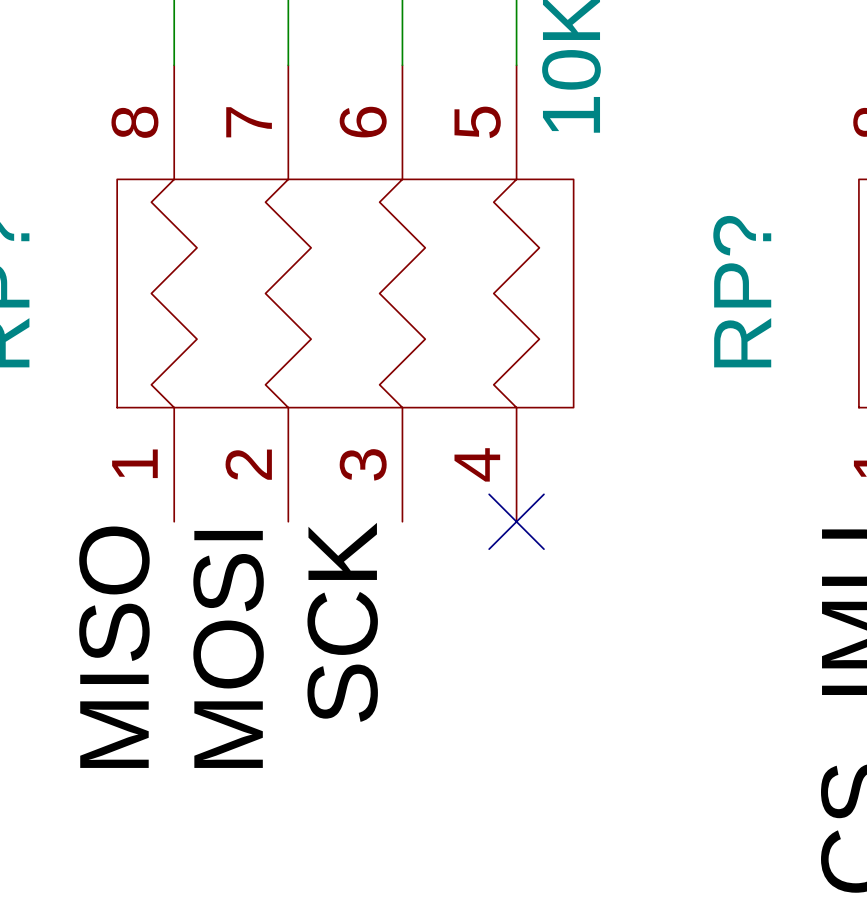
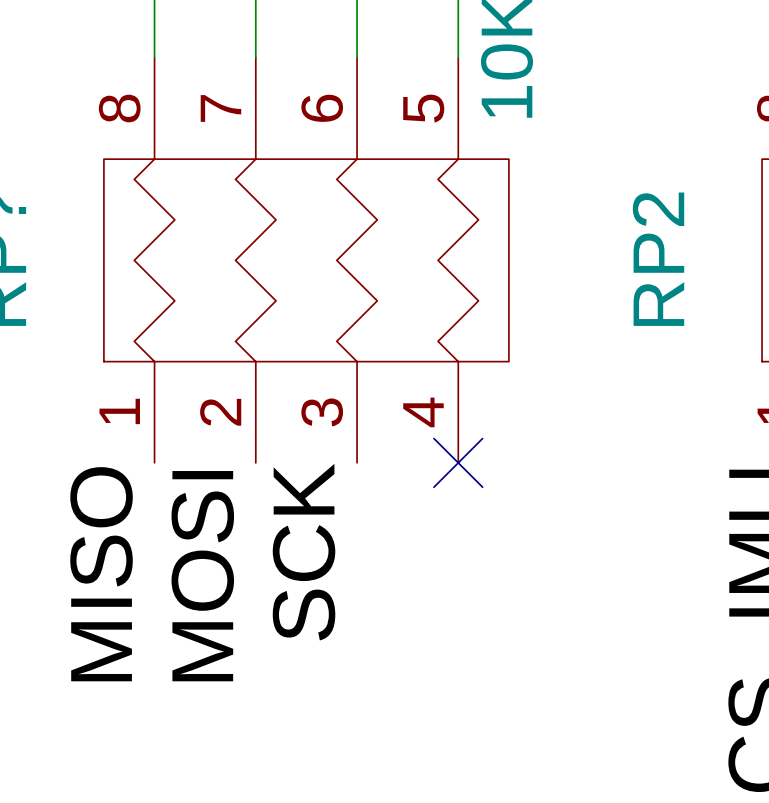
RP? name: RP? (742, 291) -> RP2 (658, 259)

